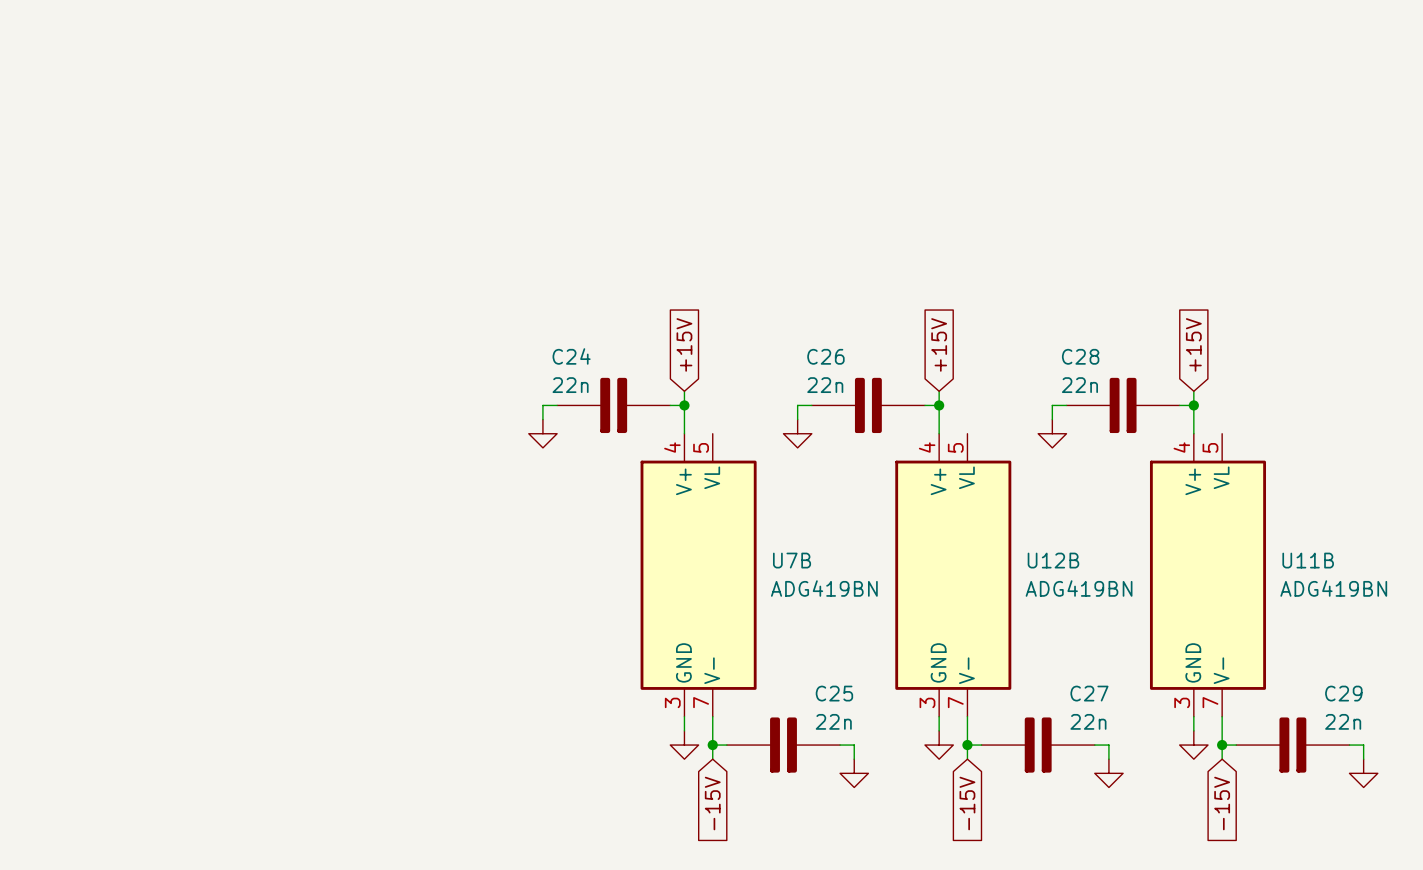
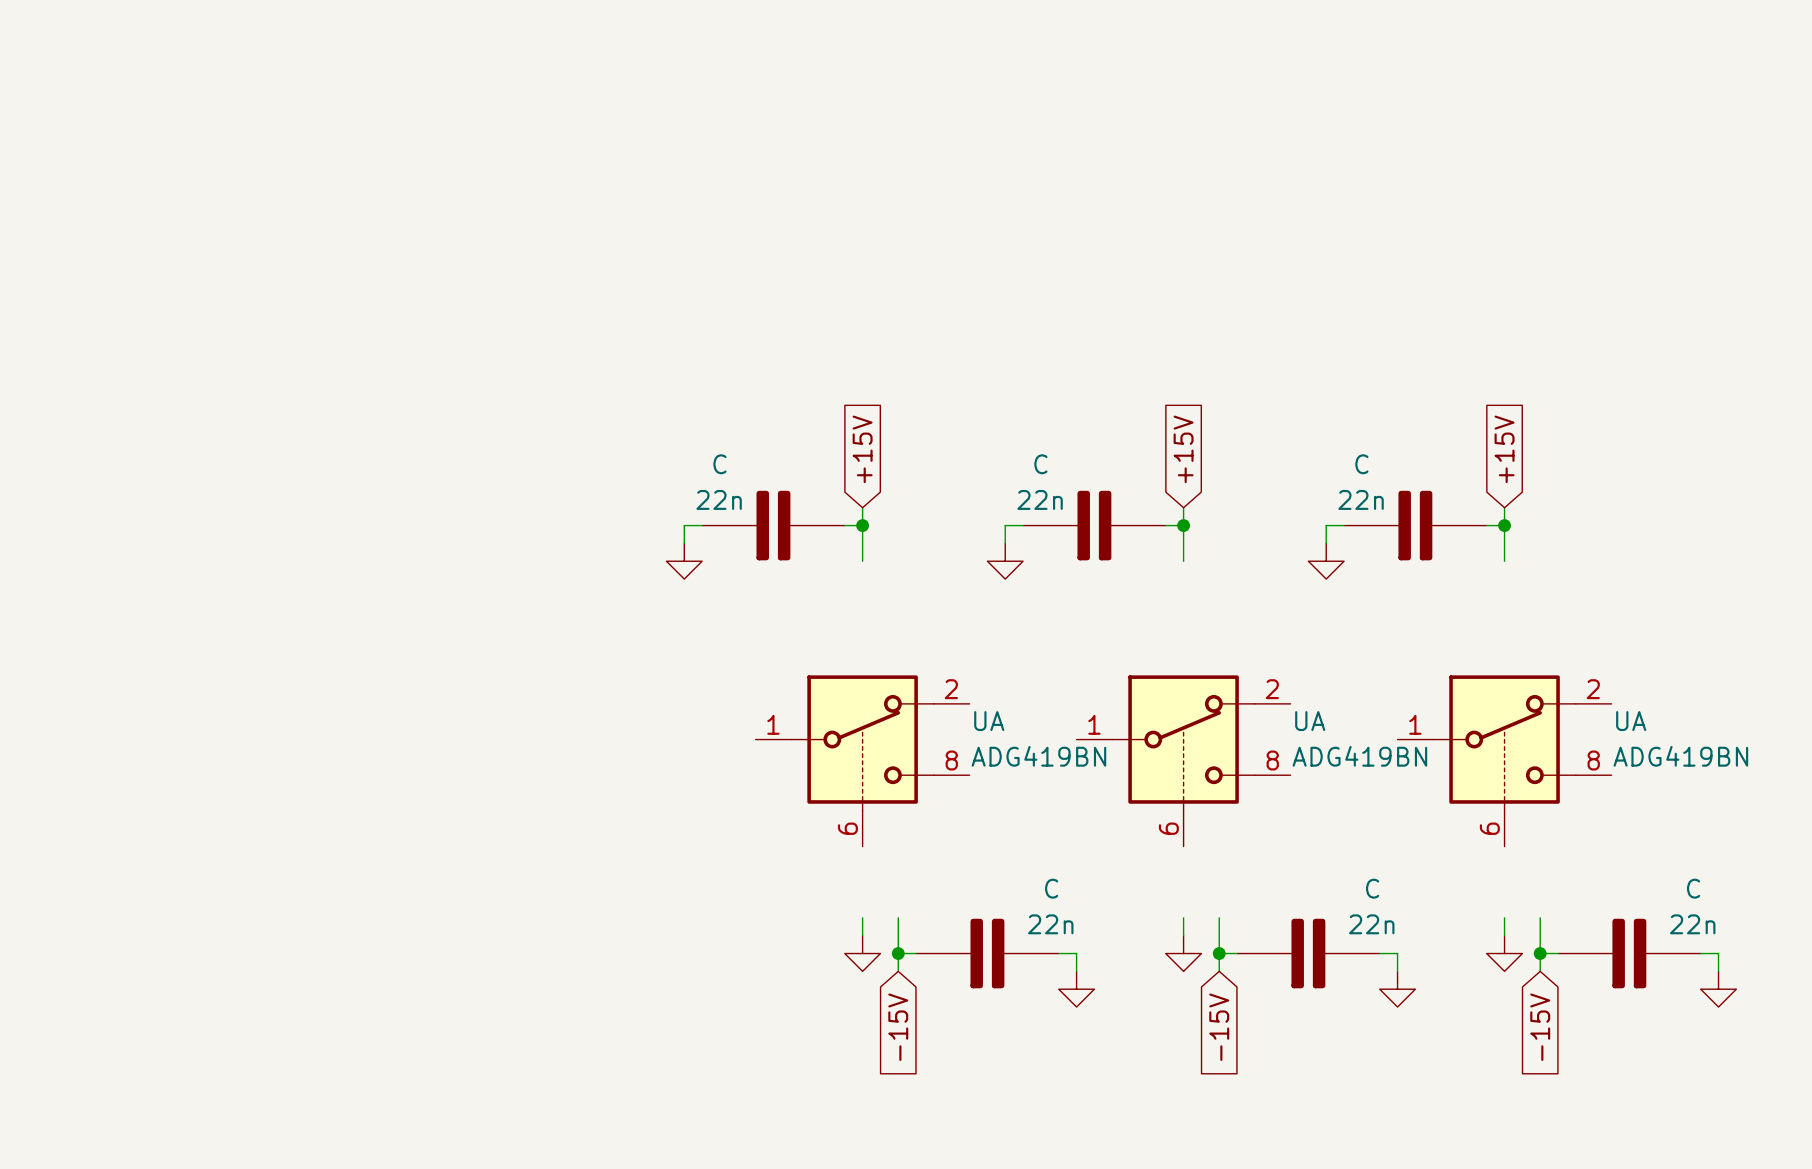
C24 name: C24 (571, 356) -> C (719, 464)
C26 name: C26 (825, 356) -> C (1040, 464)
C28 name: C28 (1080, 356) -> C (1361, 464)
U7B: ADG419BN (698, 575) -> none
U12B: ADG419BN (953, 575) -> none
U11B: ADG419BN (1207, 575) -> none
UA: none -> ADG419BN (862, 760)
UA: none -> ADG419BN (1183, 760)
UA: none -> ADG419BN (1504, 760)
C25 name: C25 (834, 693) -> C (1051, 888)
C27 name: C27 (1089, 693) -> C (1372, 888)
C29 name: C29 (1343, 693) -> C (1693, 888)

